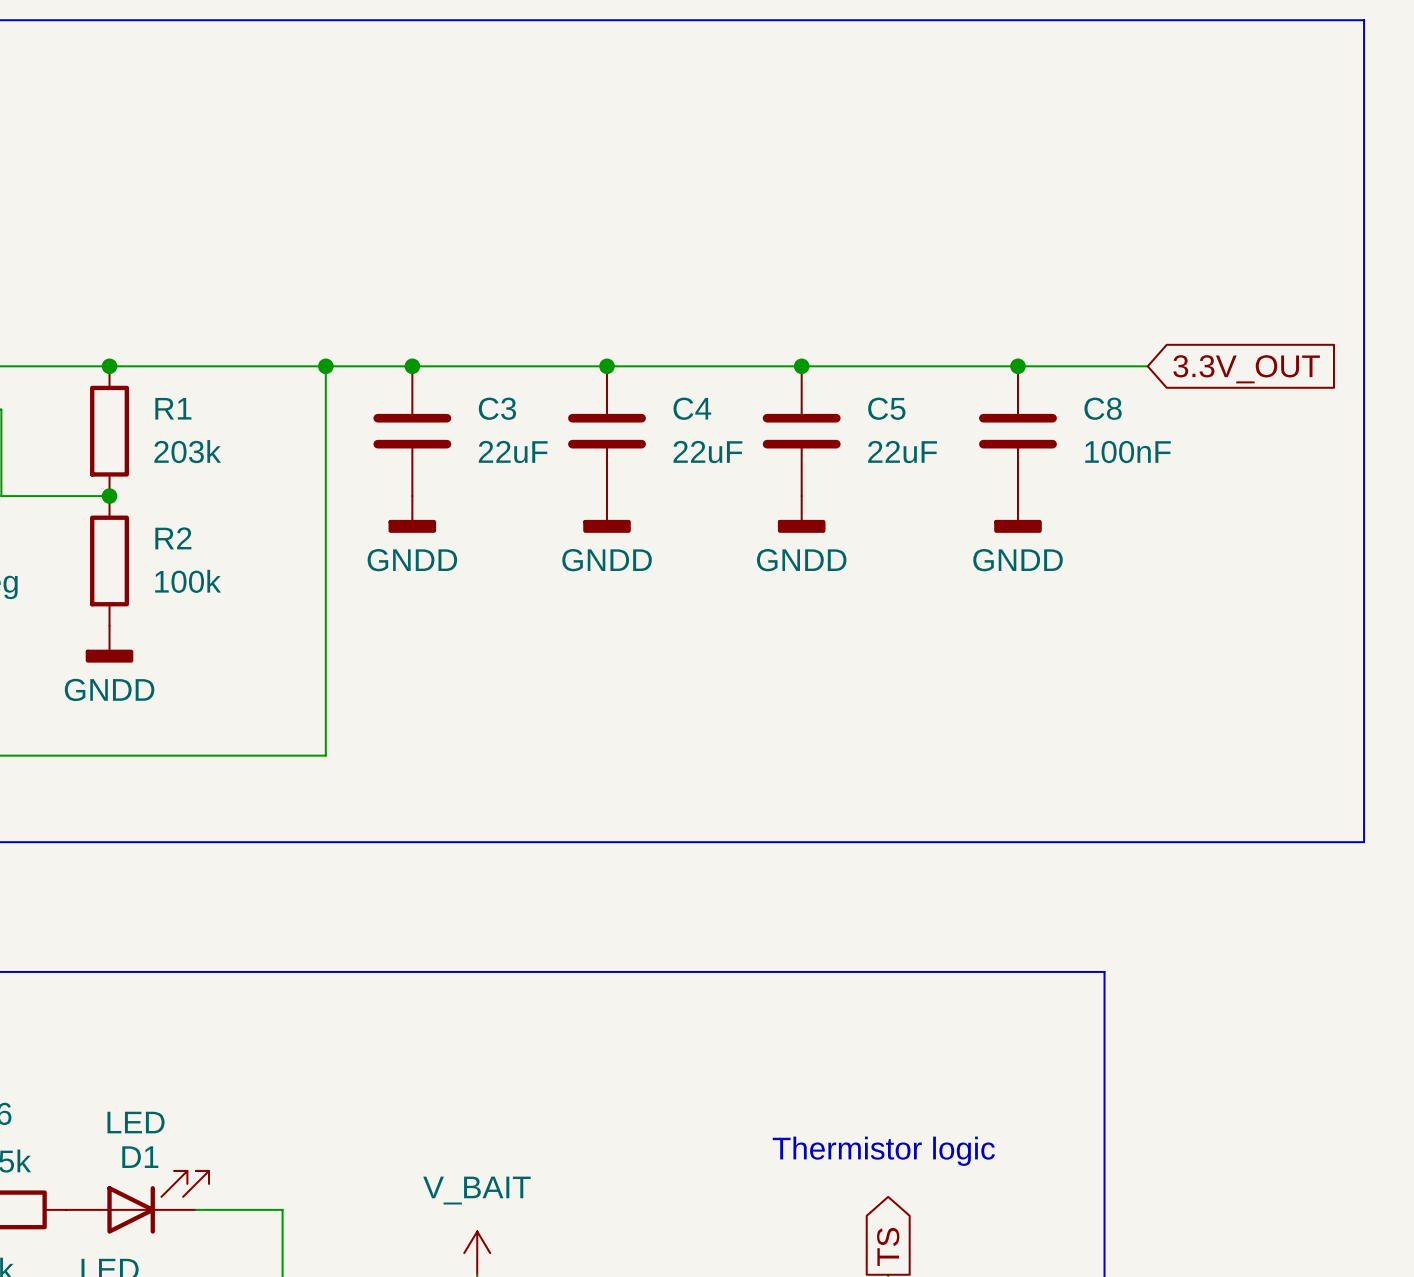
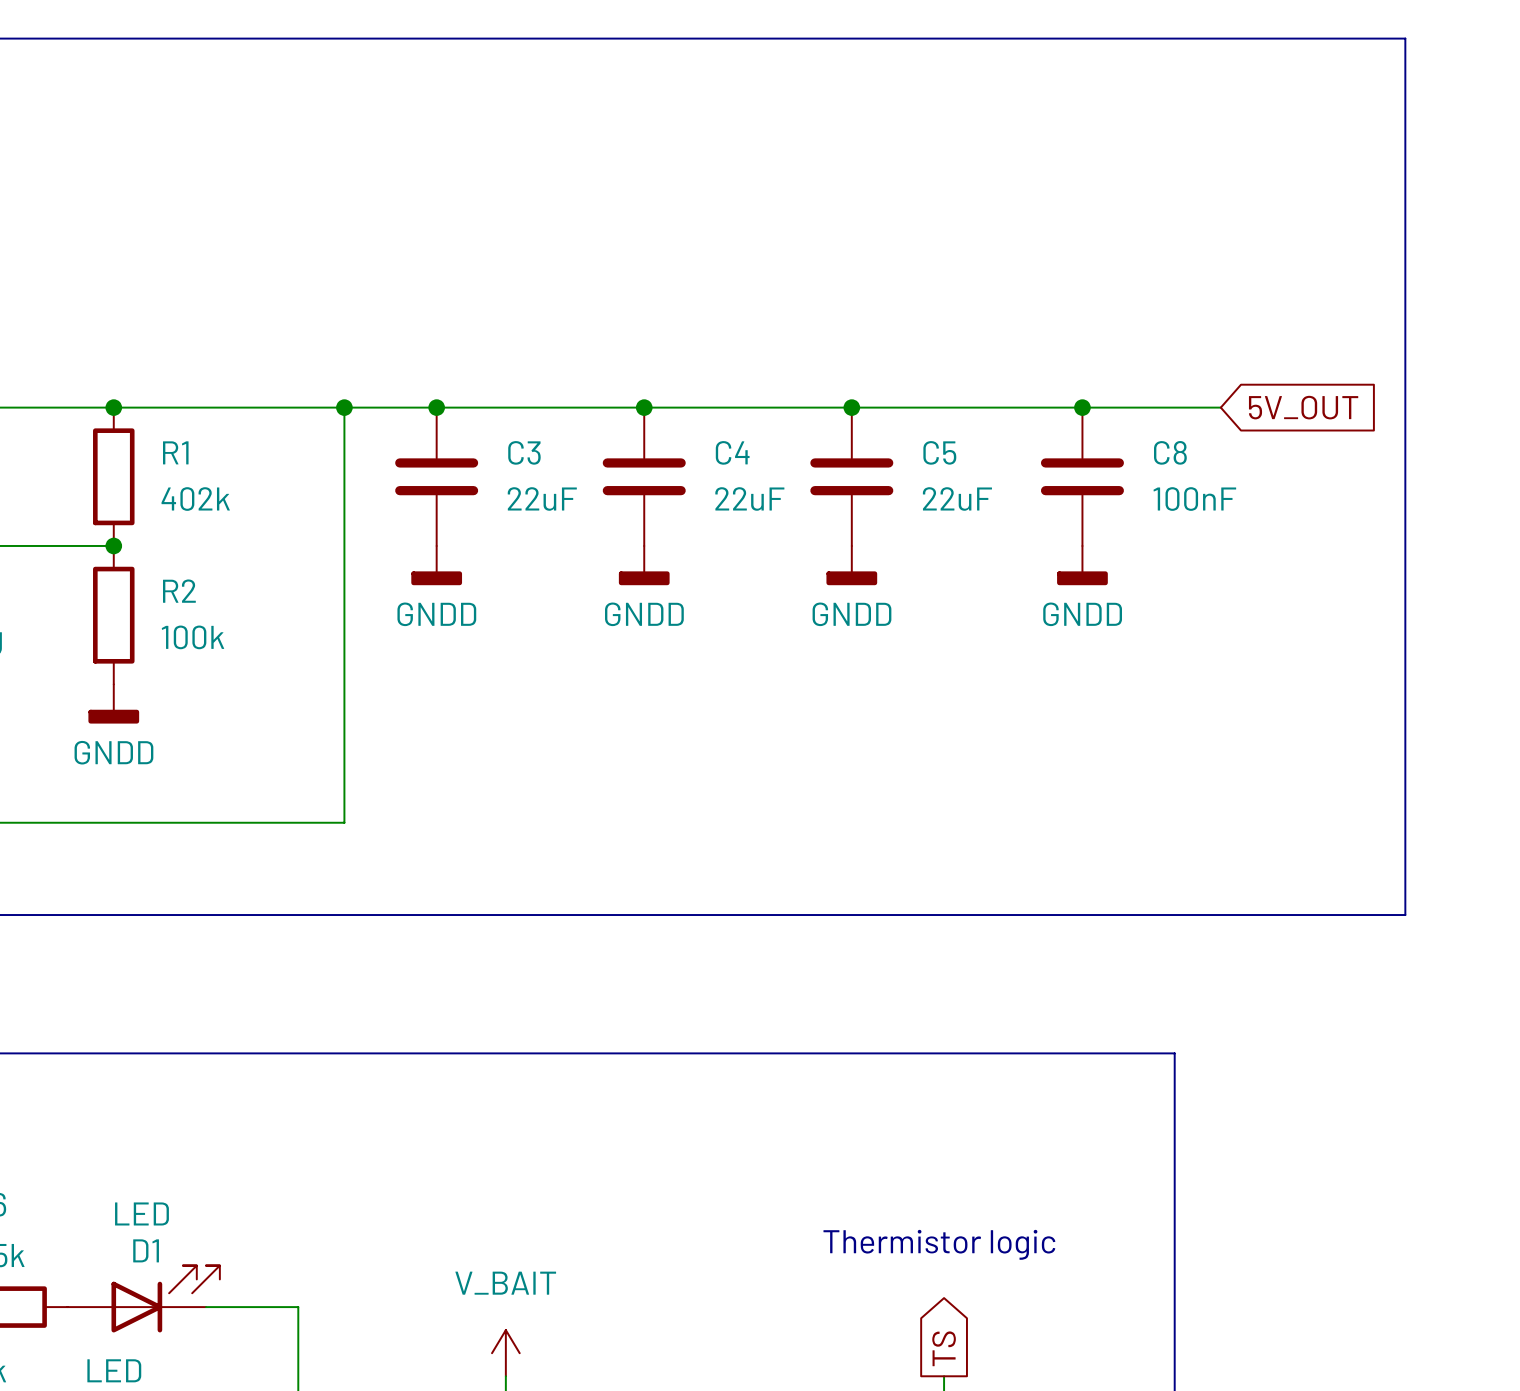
line: (1320, 20) (1364, 20) (1364, 842) (1320, 842) -> (1405, 38) (1405, 915)
global label: 3.3V_OUT (1246, 369) -> 5V_OUT (1303, 407)
R1 value: 203k (187, 451) -> 402k (195, 499)

